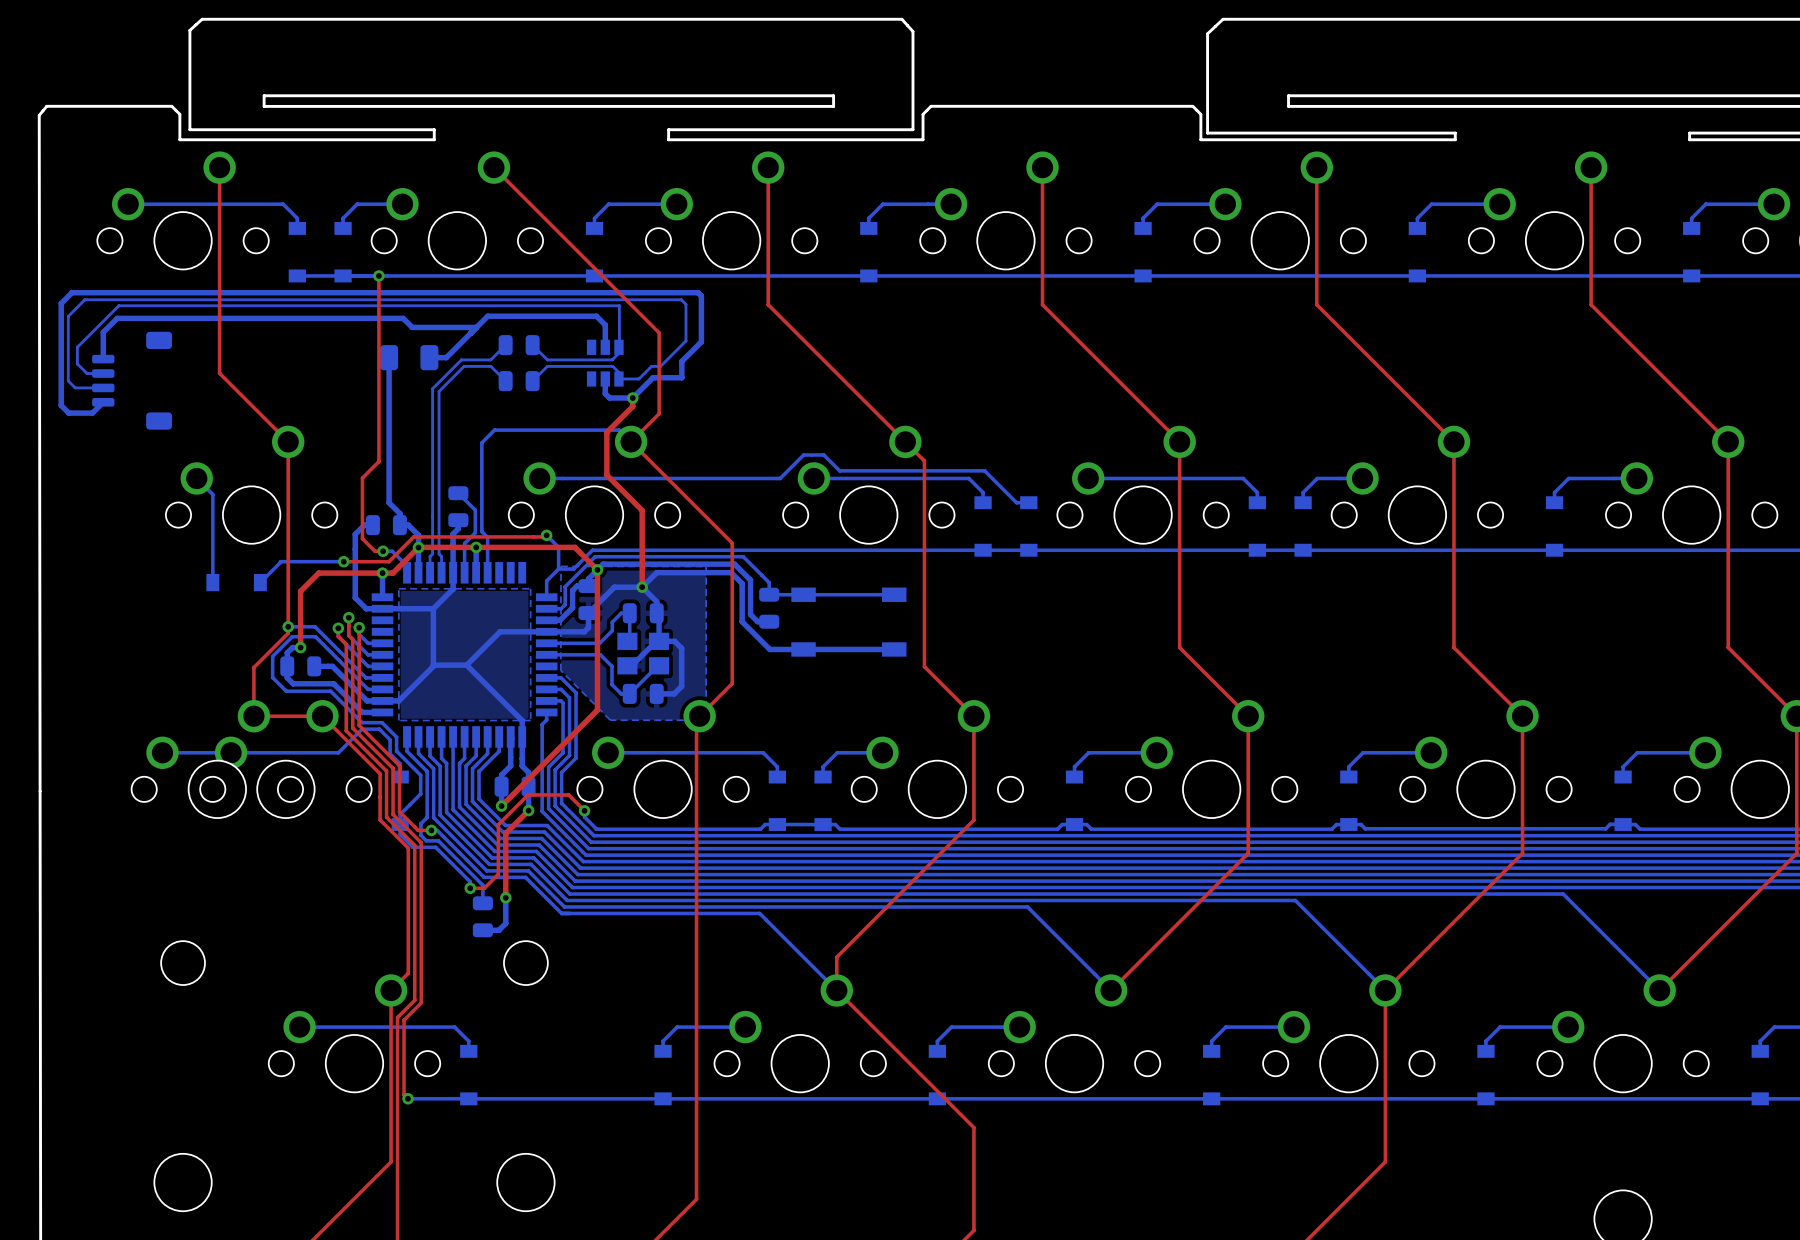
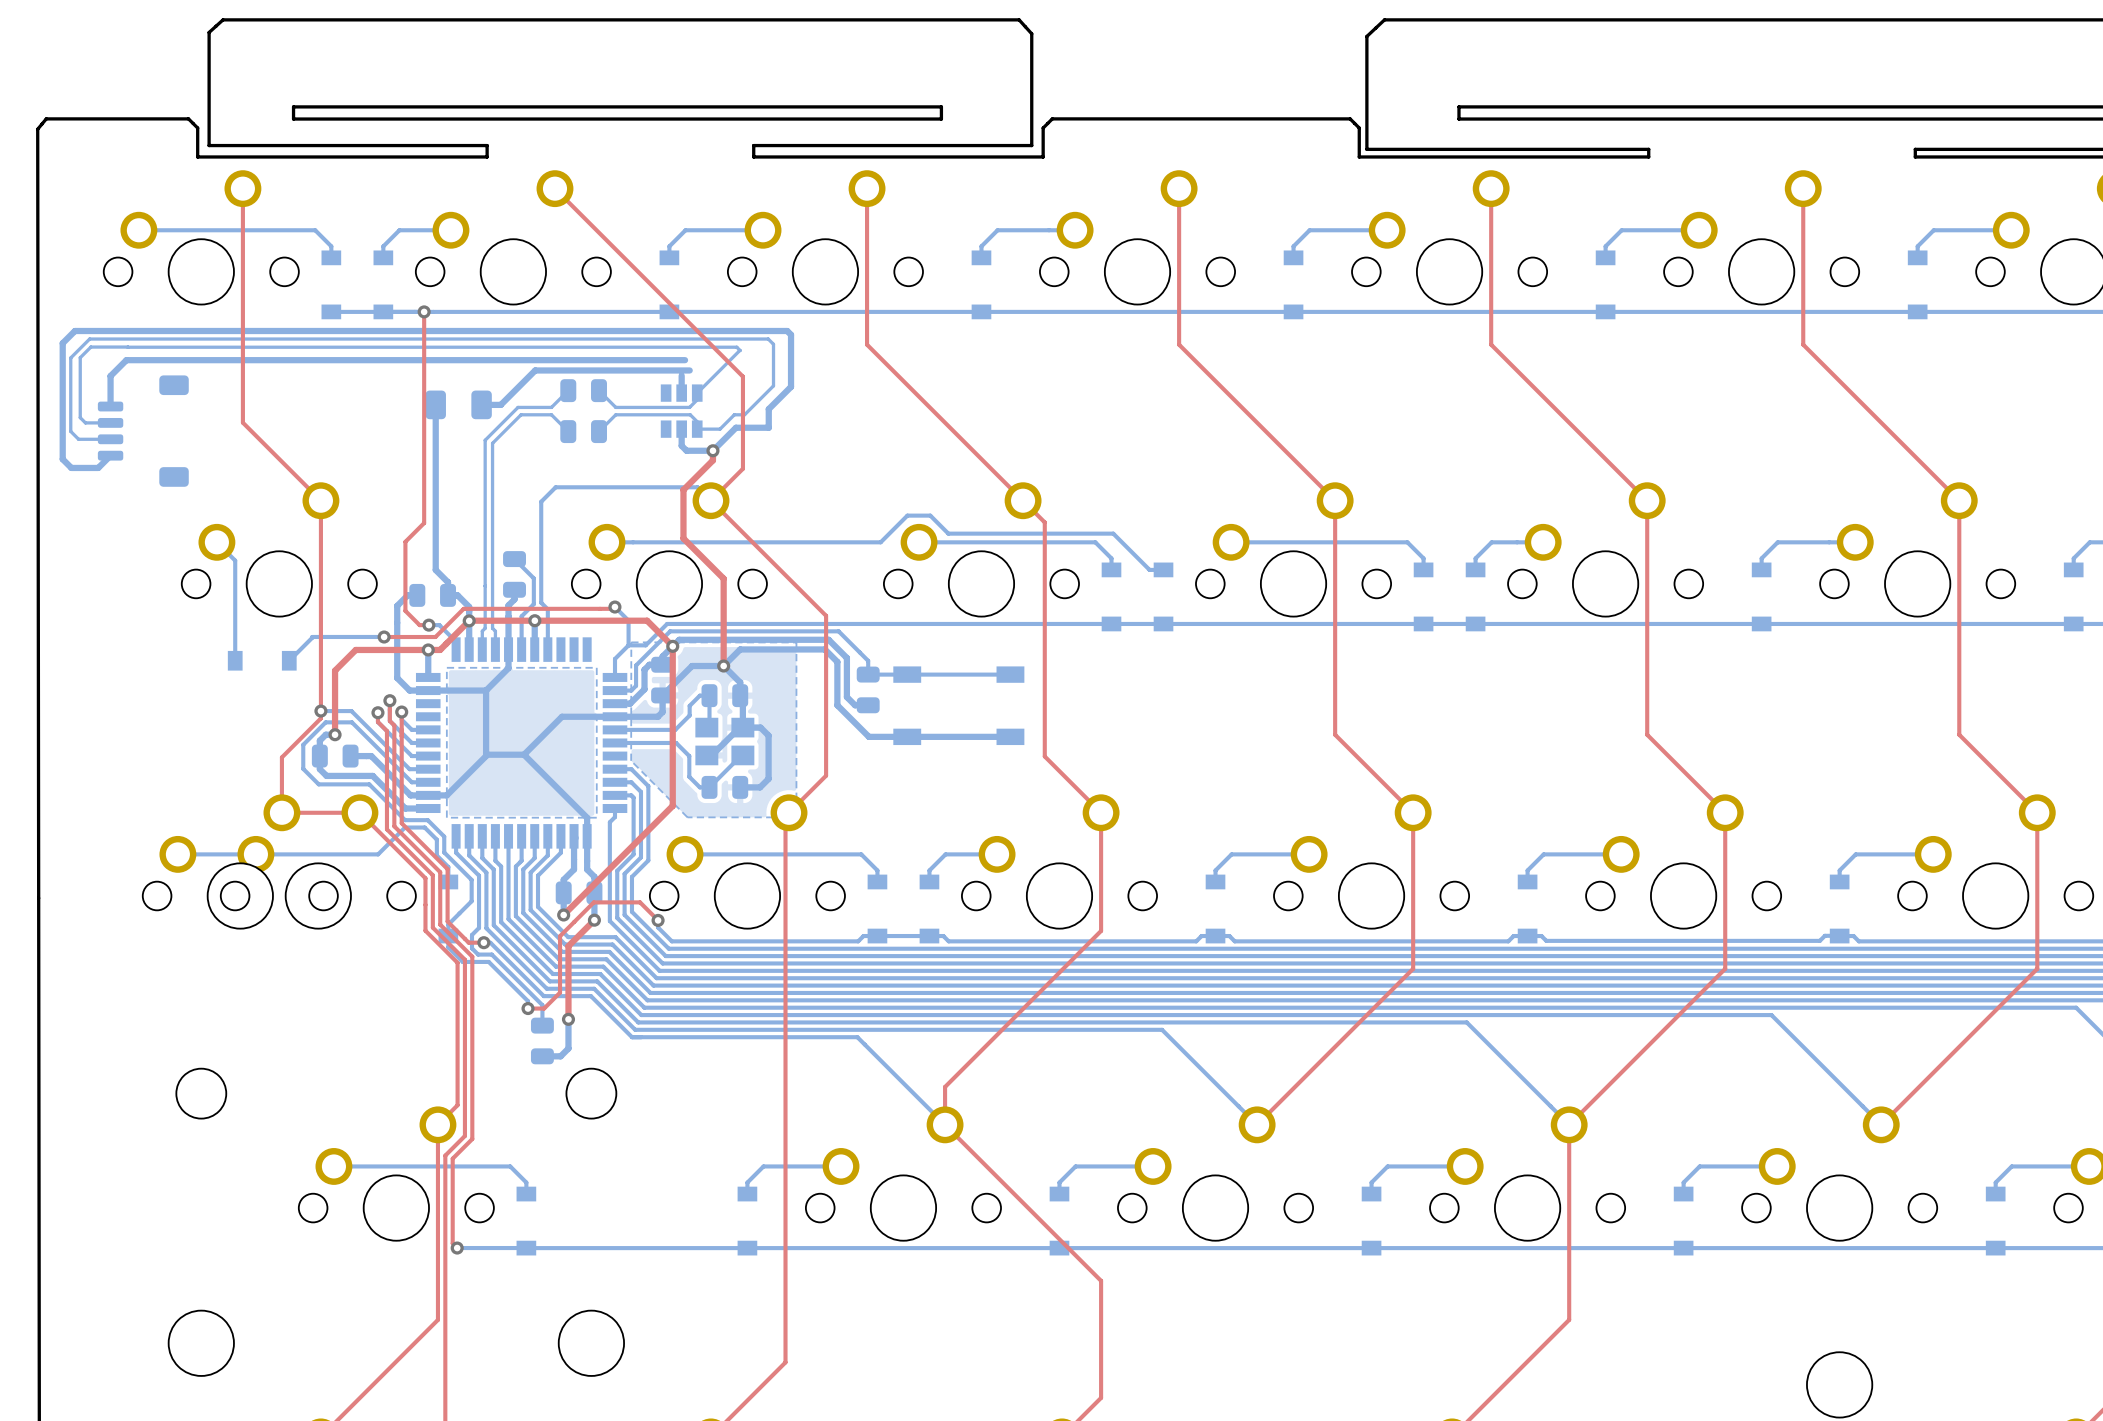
bottom track: none -> (128, 347) (736, 347) (740, 350)
bottom track: none -> (739, 350) (697, 392)
bottom track: (403, 318) (412, 327) (476, 327) (487, 316) (596, 316) (605, 325) (605, 332) -> (451, 360) (685, 360)
bottom track: none -> (535, 370) (689, 370)
bottom track: (619, 346) (619, 305) (118, 305) (77, 347) (77, 363) (87, 373) -> (127, 347) (90, 347) (80, 357) (80, 417) (85, 422) (92, 422)

